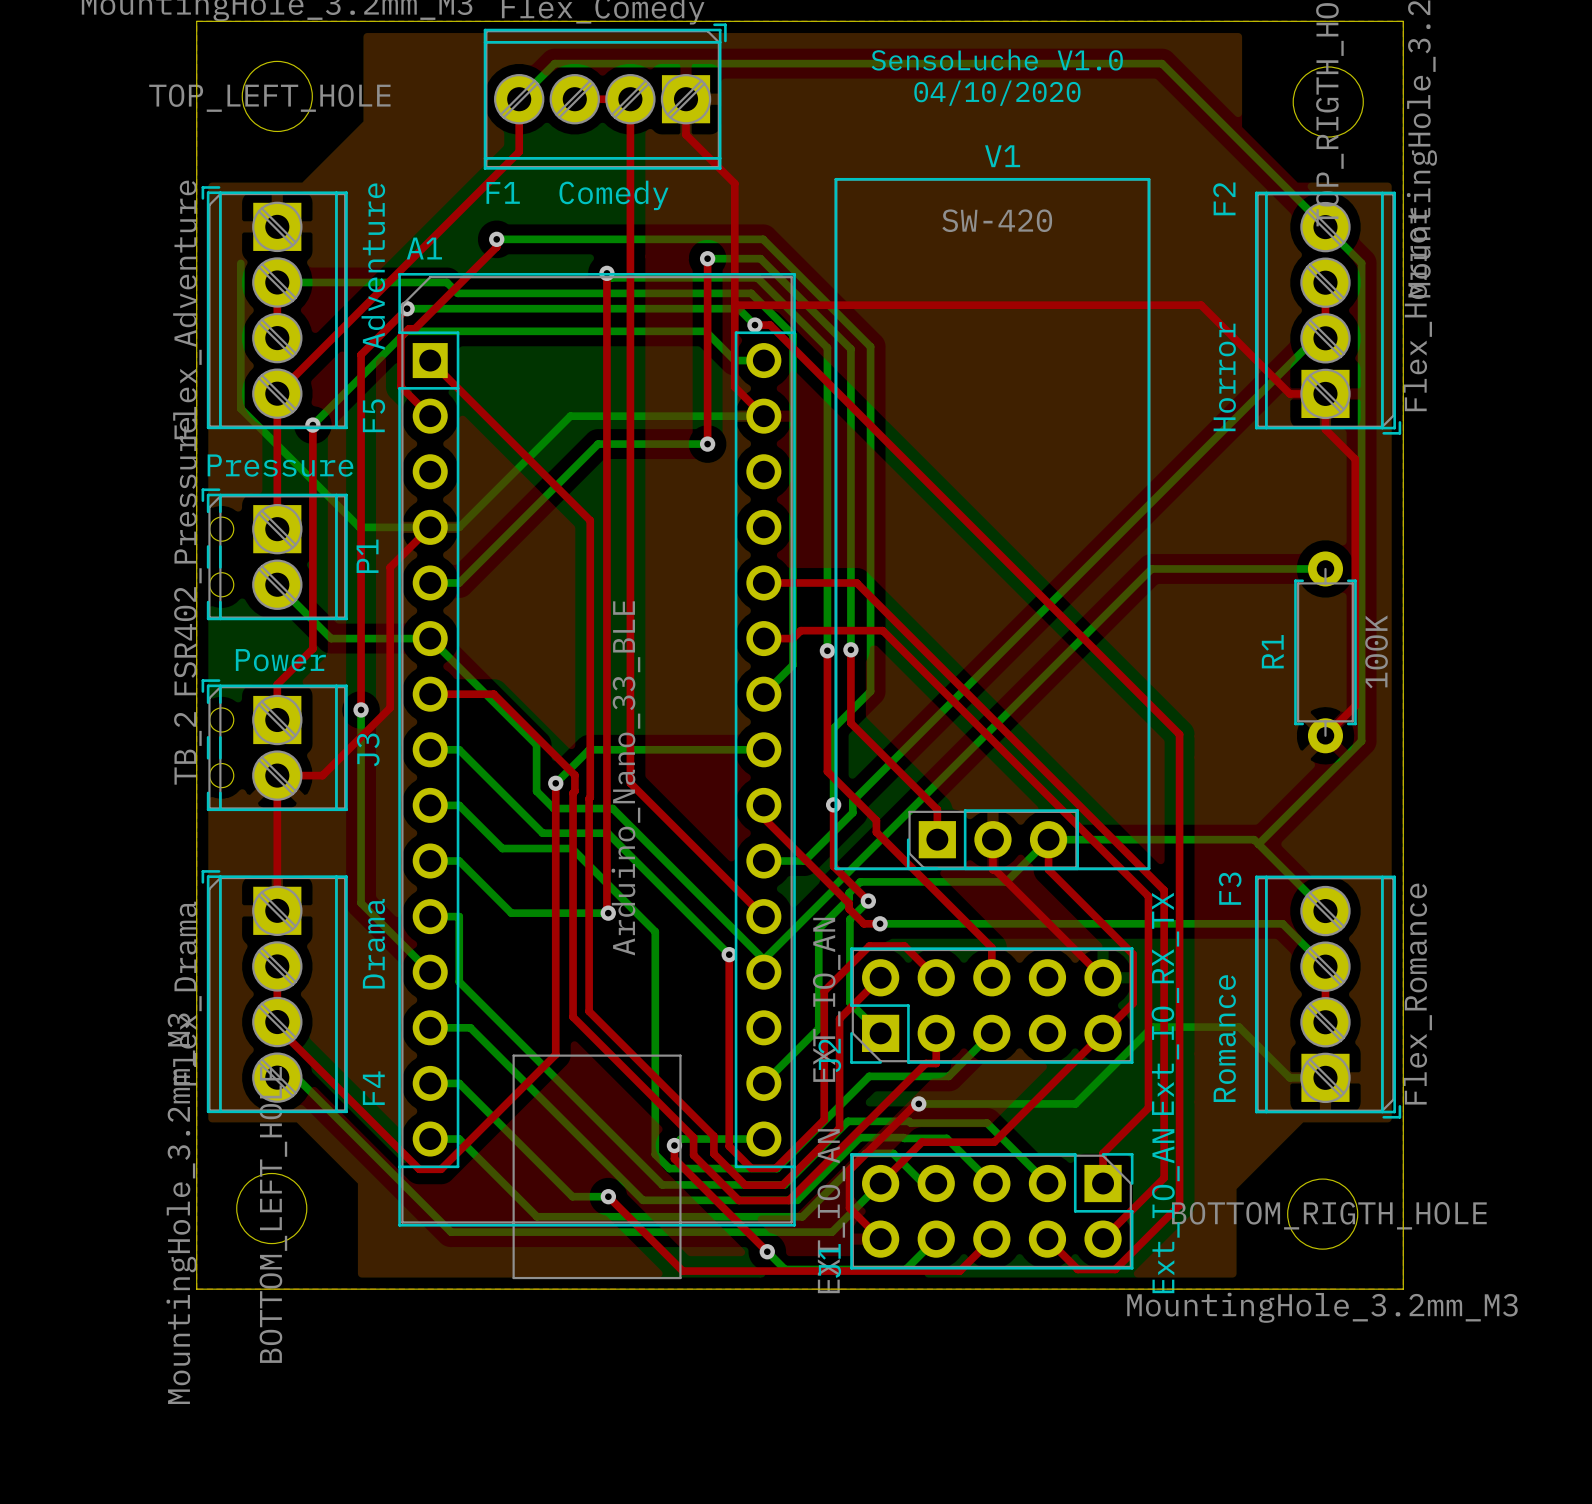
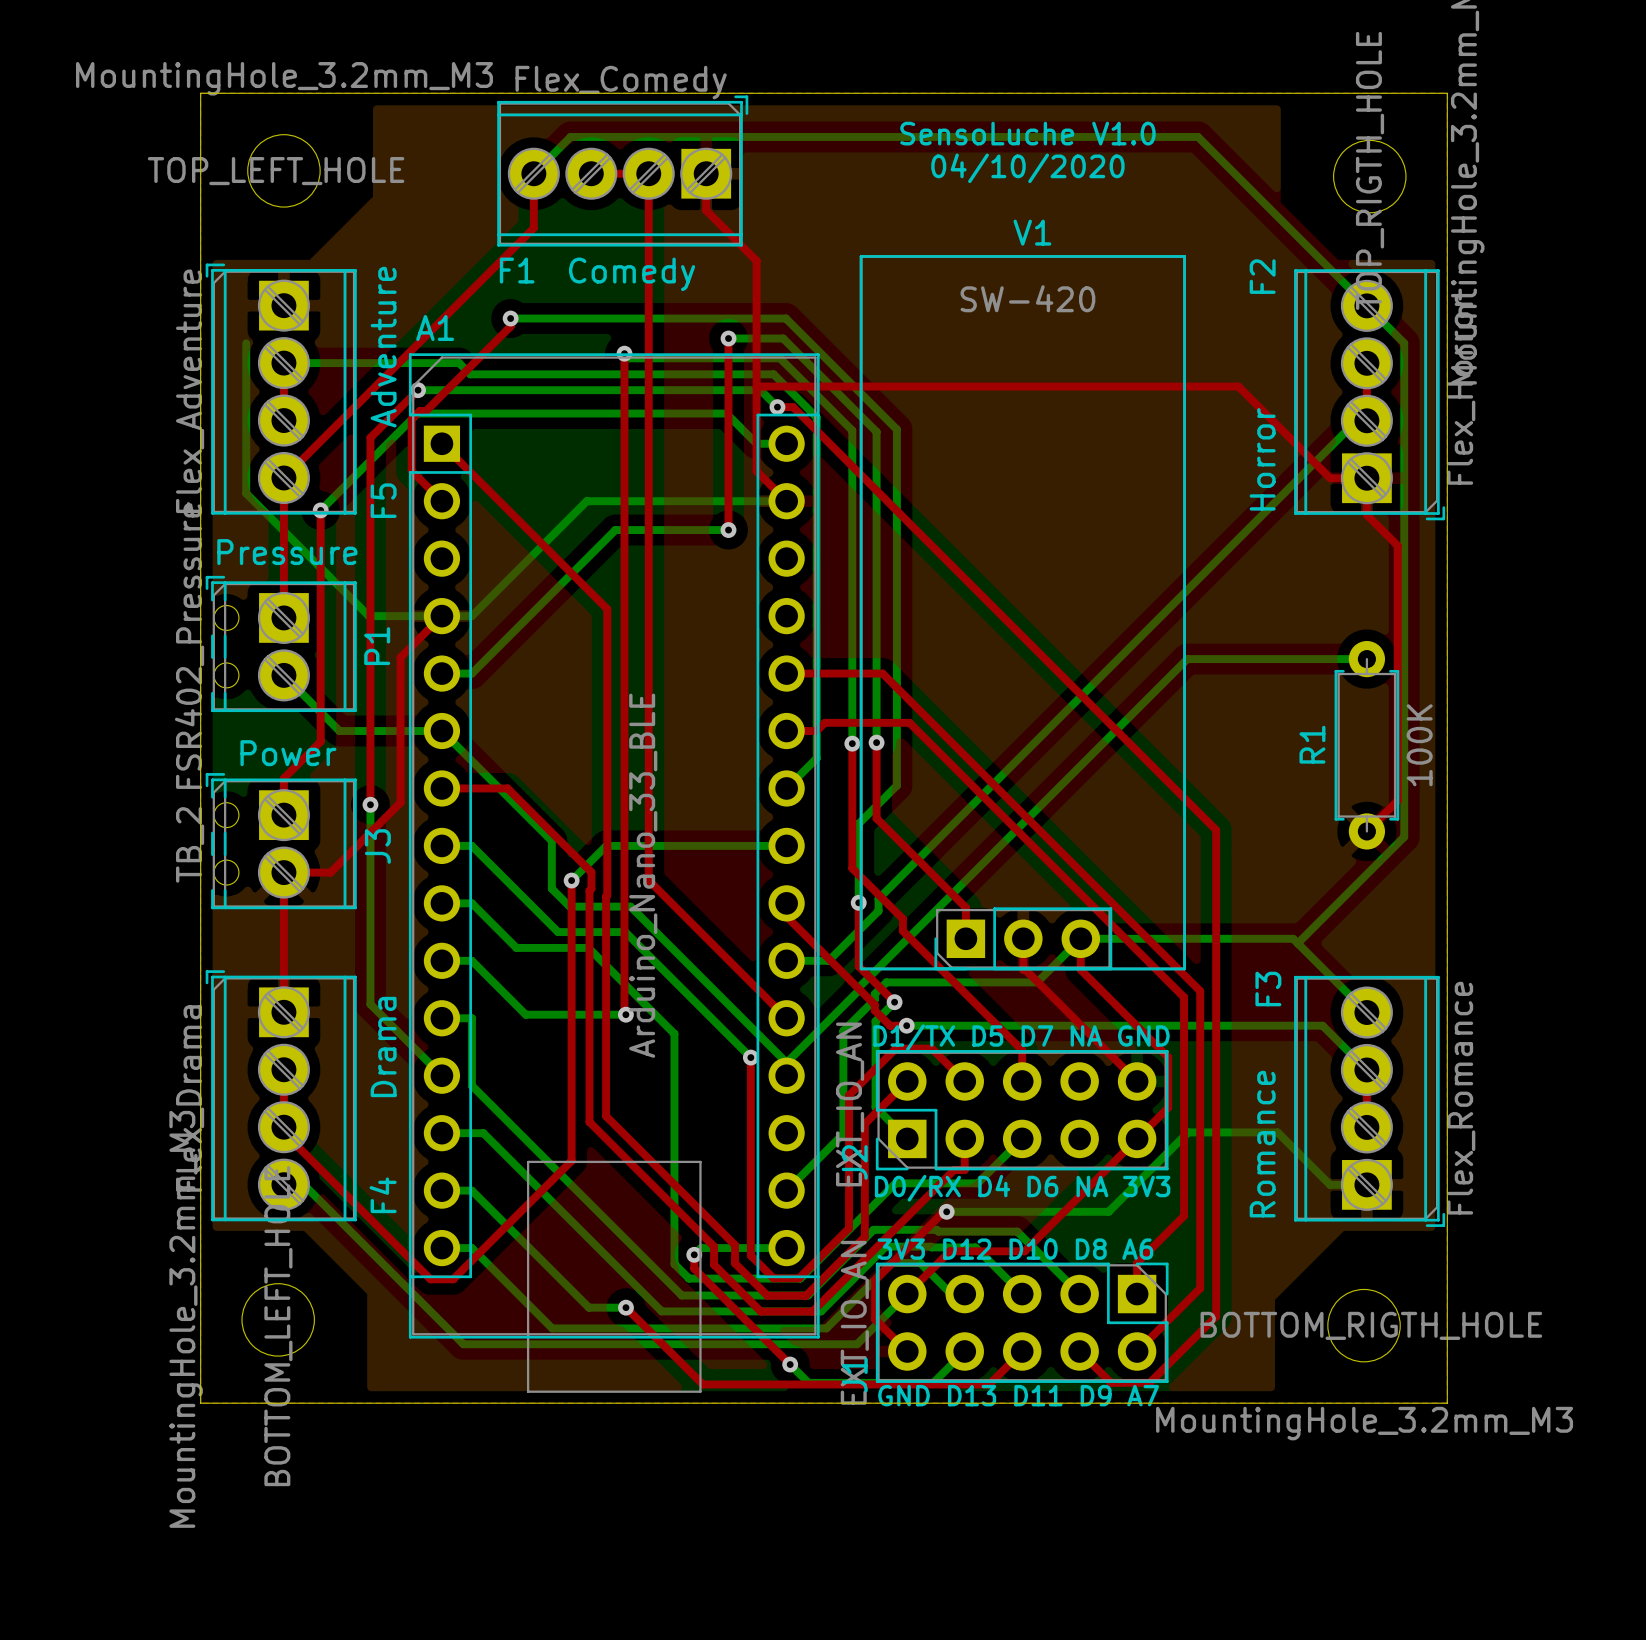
text: none -> D1/TX D5 D7 NA GND (1021, 1037)
text: Ext_IO_RX_TX (1165, 1003) -> none
text: none -> D0/RX D4 D6 NA 3V3 (1022, 1188)
text: none -> 3V3 D12 D10 D8 A6 (1015, 1249)
text: Ext_IO_AN (1165, 1211) -> none
text: none -> GND D13 D11 D9 A7 (1018, 1395)

